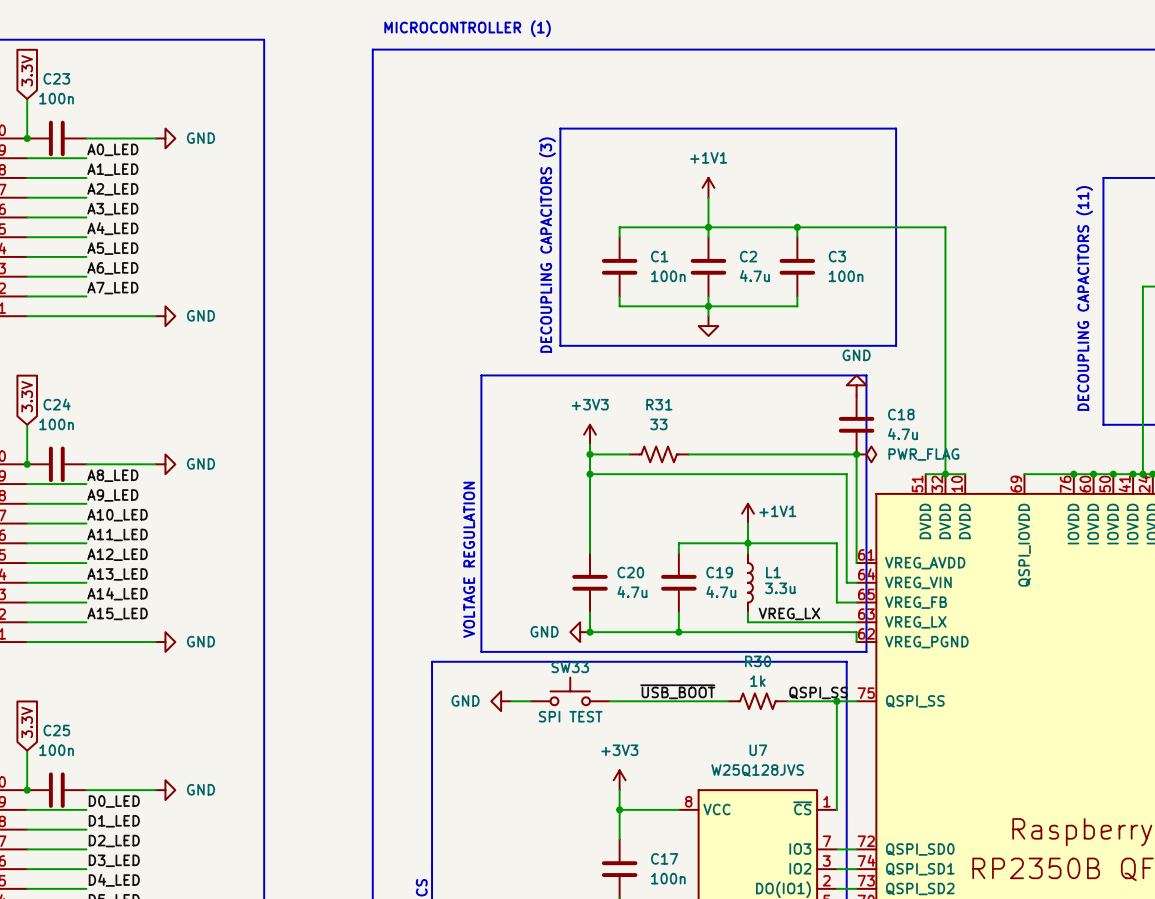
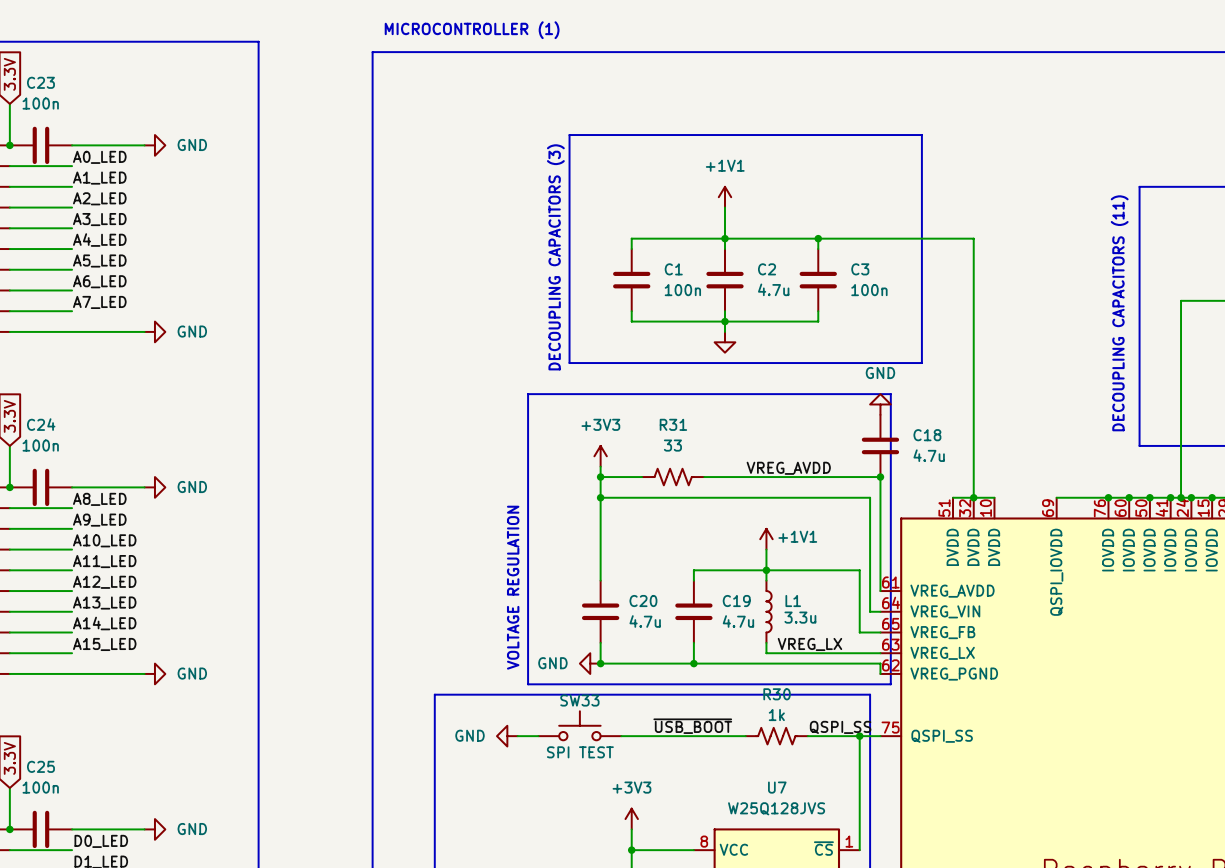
line: (520, 375) (481, 375) (481, 651) (520, 651) -> (528, 394) (528, 684)
label: none -> VREG_AVDD (788, 468)
power symbol: PWR_FLAG (866, 454) -> none
text position: VOLTAGE REGULATION (469, 559) -> VOLTAGE REGULATION (513, 587)

